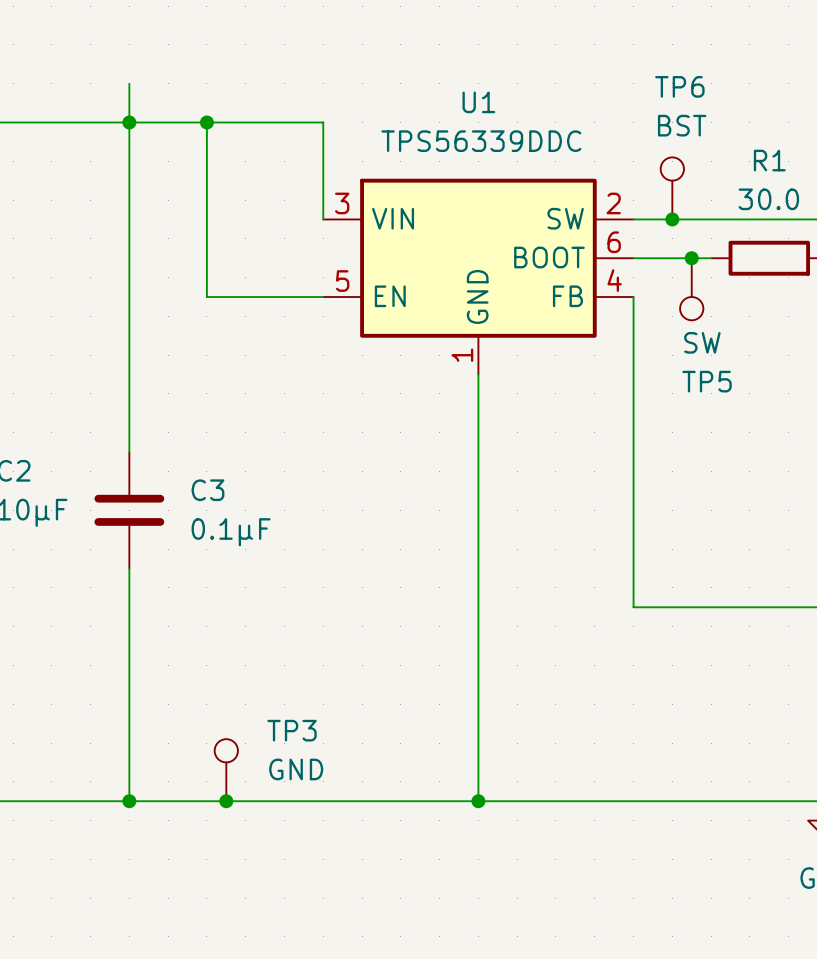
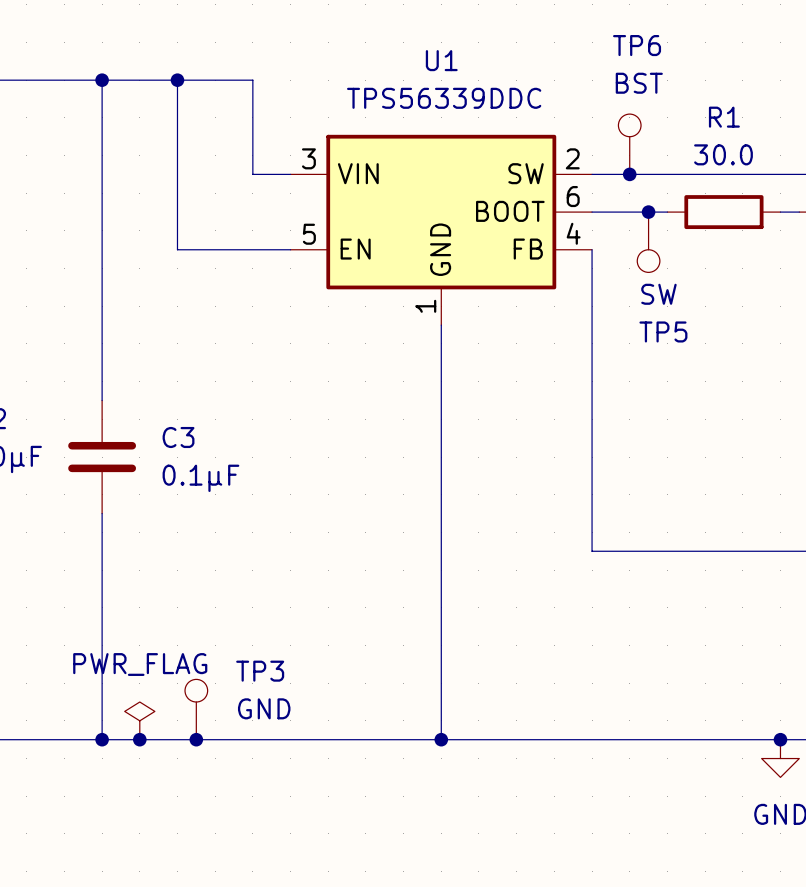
wire: (129, 83) (129, 122) -> none
wire: (284, 122) (323, 122) (323, 219) -> (252, 80) (252, 174) (290, 174)
power symbol: none -> PWR_FLAG (139, 720)
junction: none -> (139, 739)

